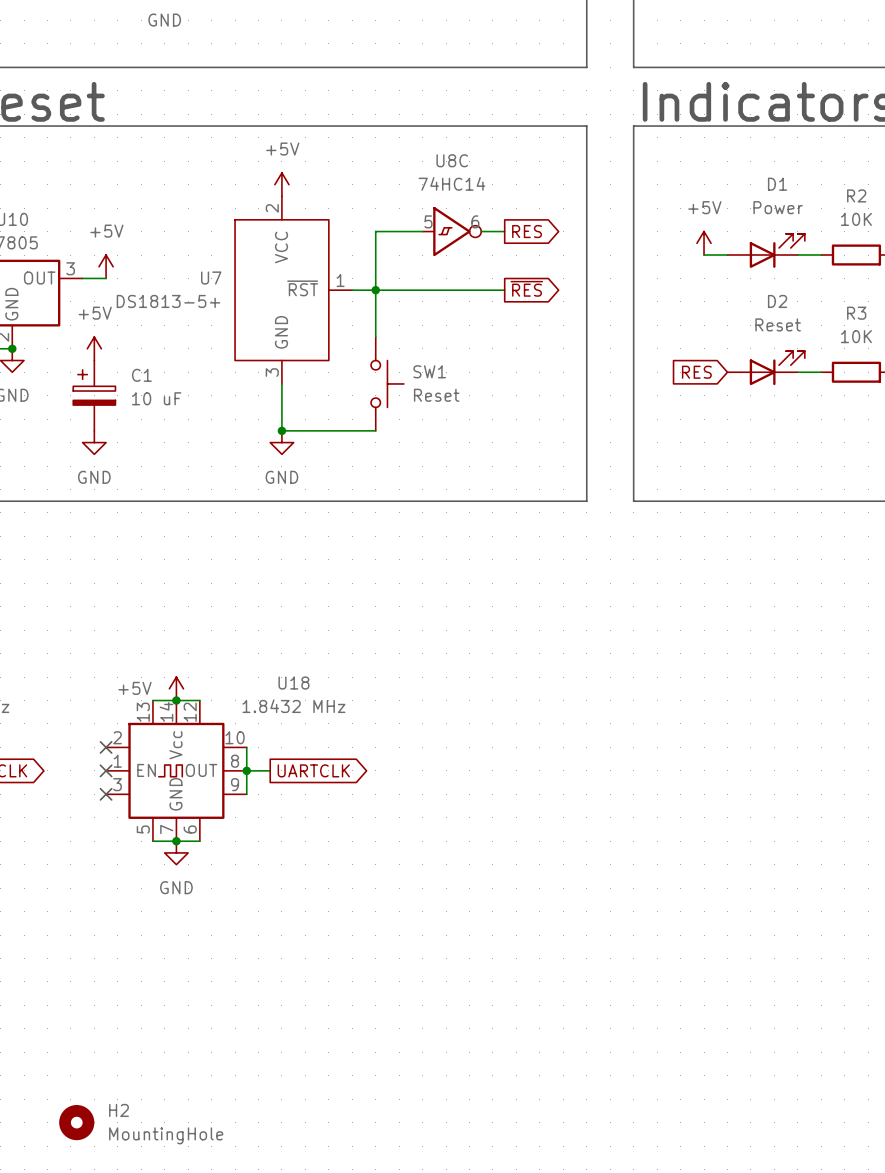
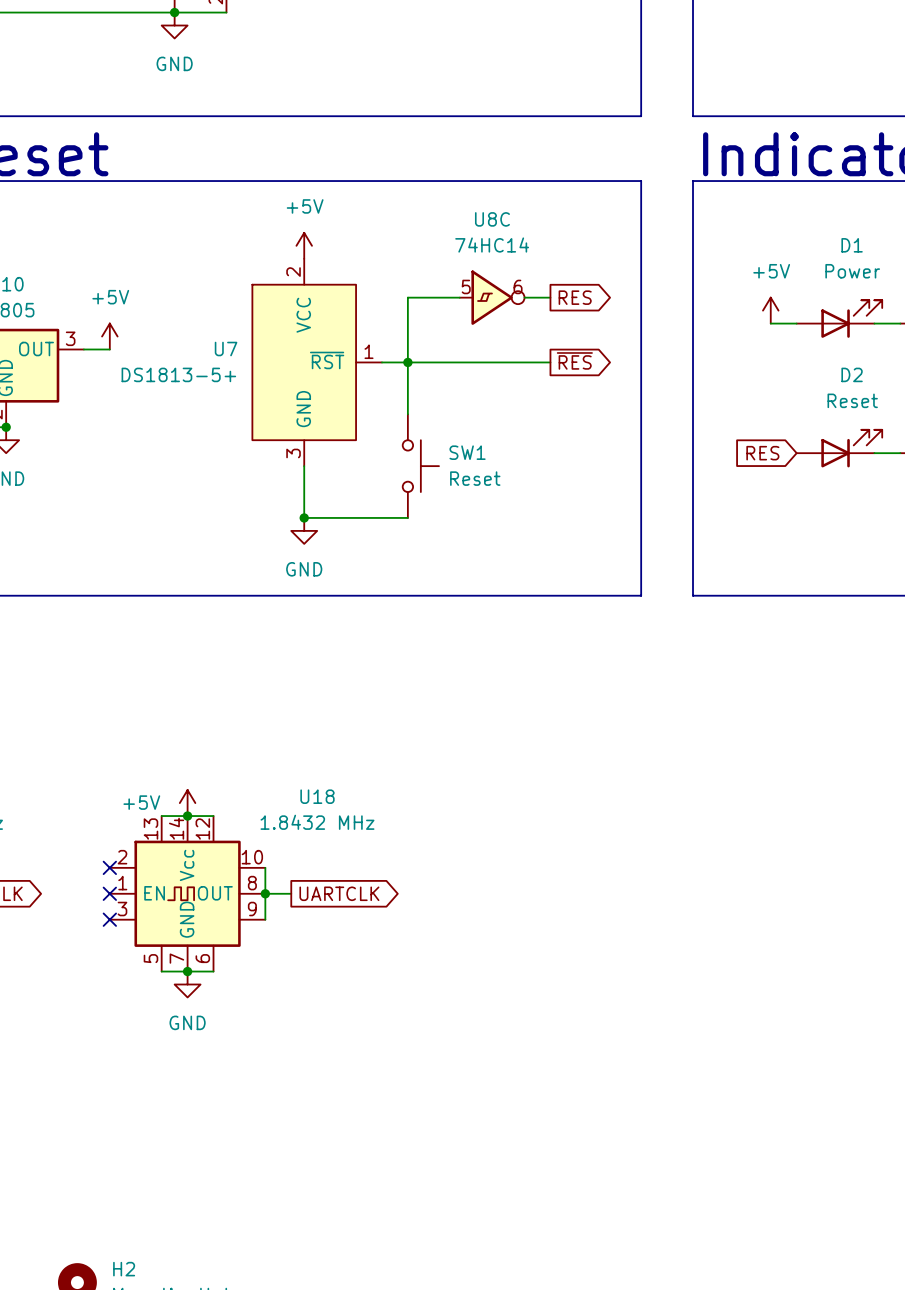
power symbol: +5V (94, 348) -> none
C1: 10 uF (94, 395) -> none
power symbol: GND (94, 442) -> none

